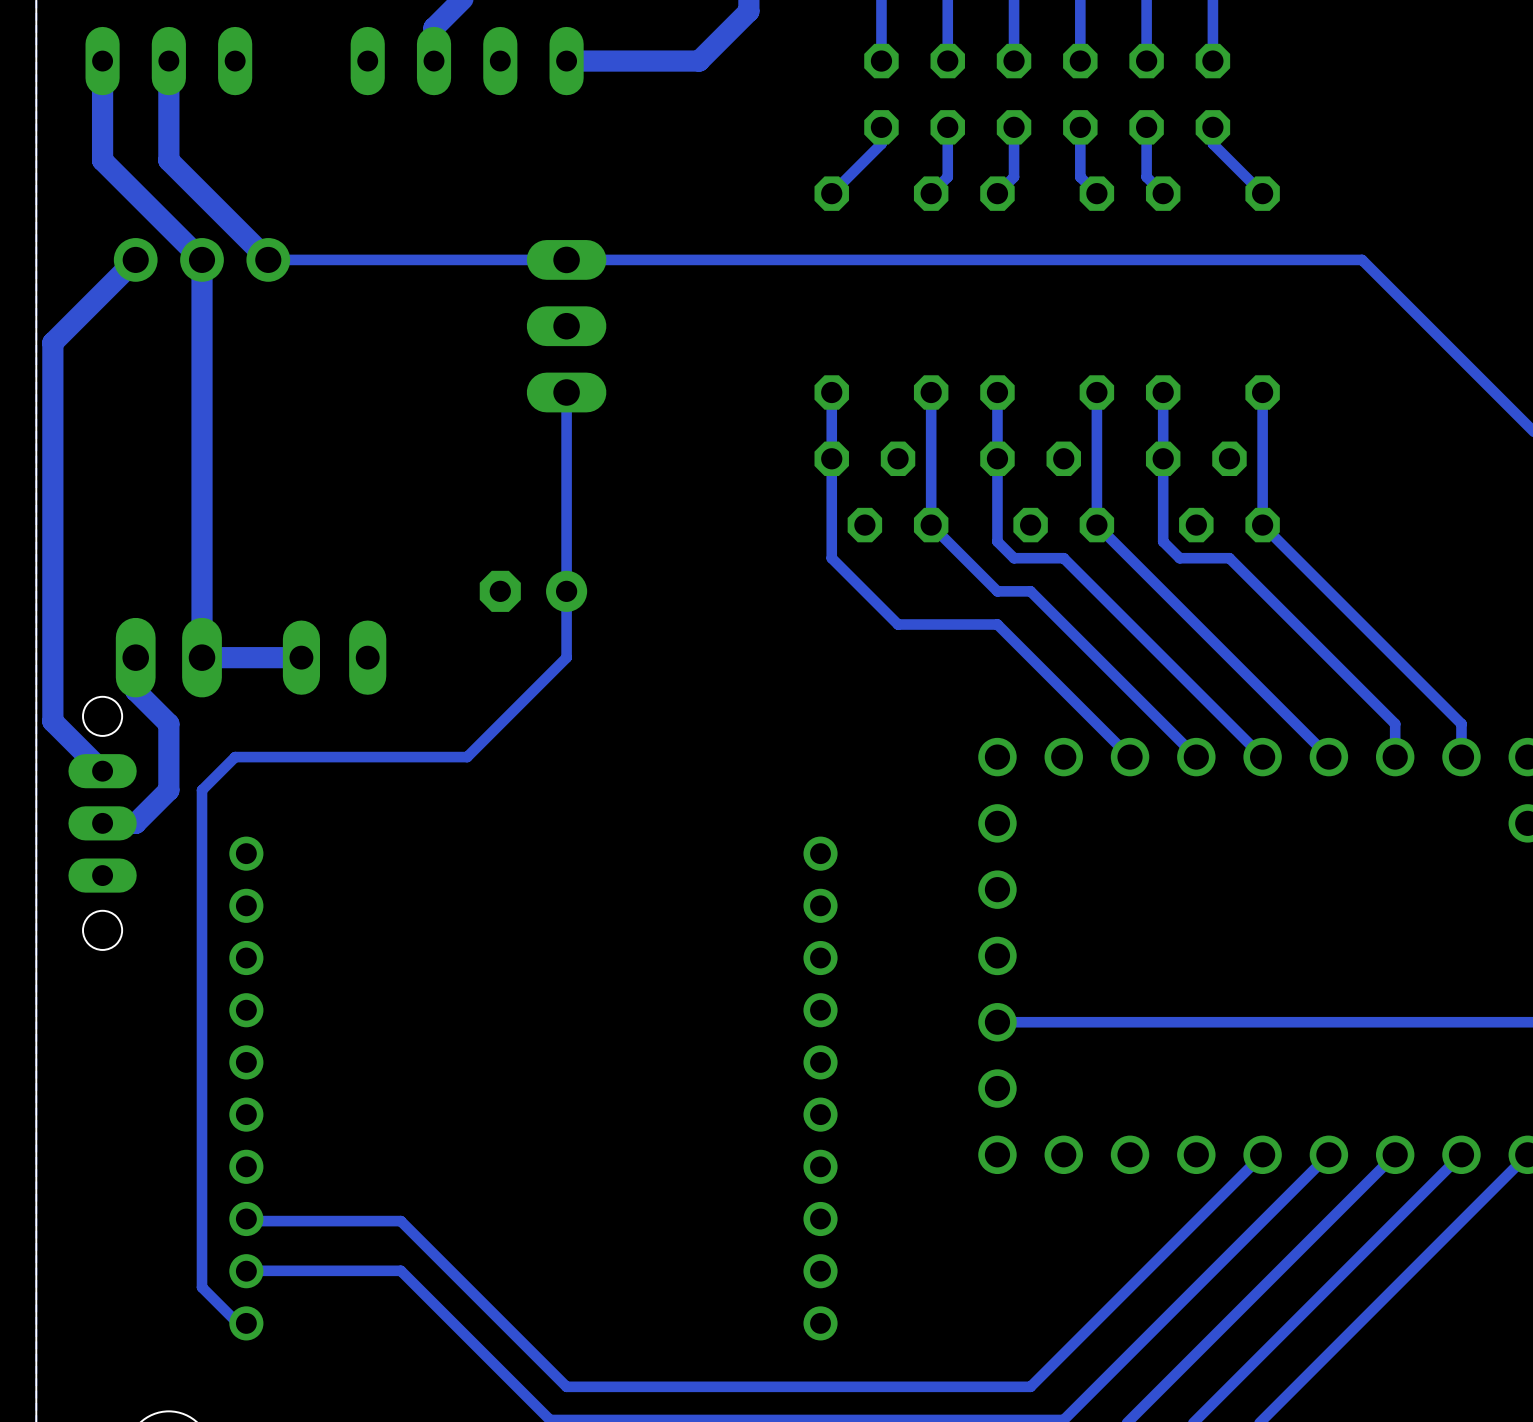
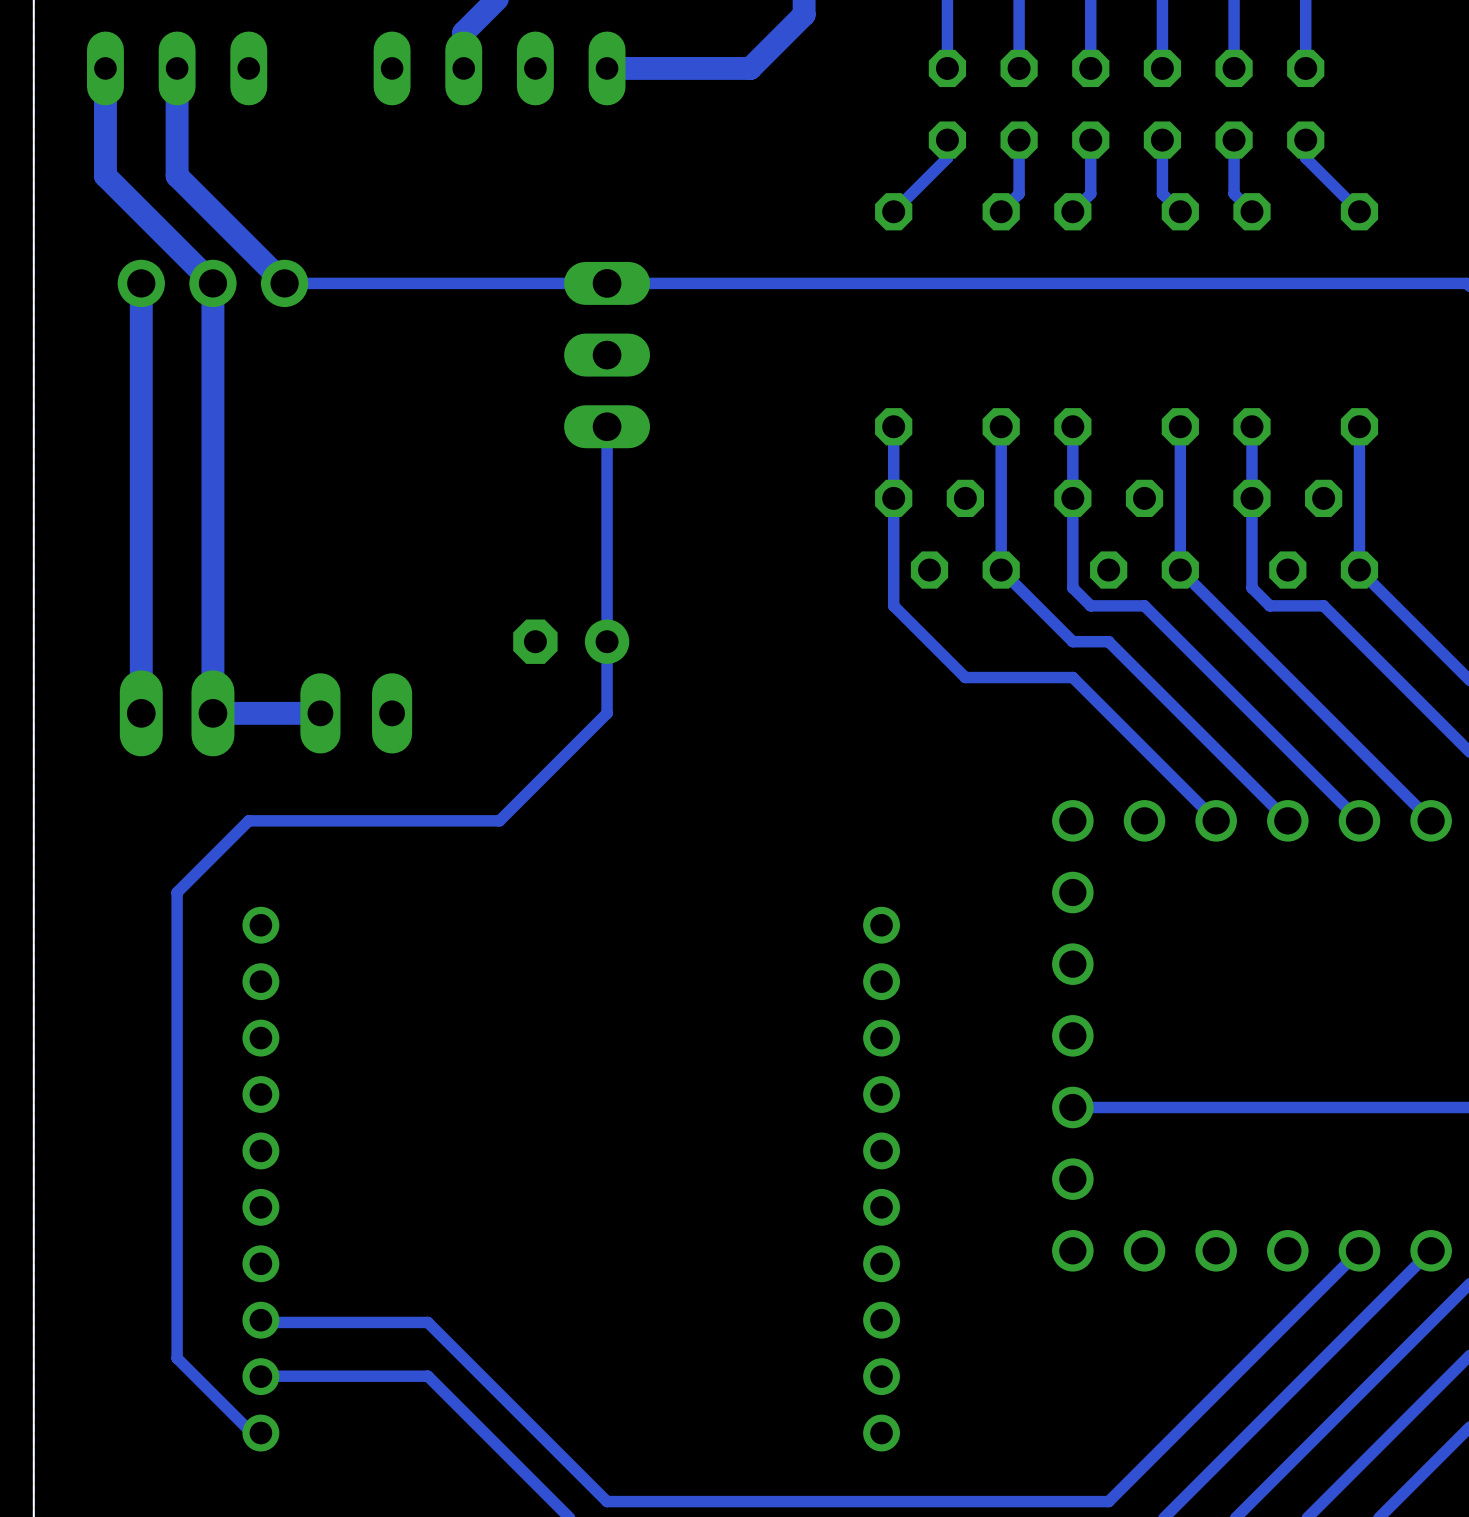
track: (135, 259) (52, 342) (52, 721) (102, 771) -> (141, 283) (141, 713)
track: (135, 657) (135, 690) (168, 723) (168, 790) (135, 823) (102, 823) -> none
track: (202, 790) (202, 1287) -> (212, 856) (177, 892) (177, 1358) (212, 1394)
part: (102, 823) -> none

